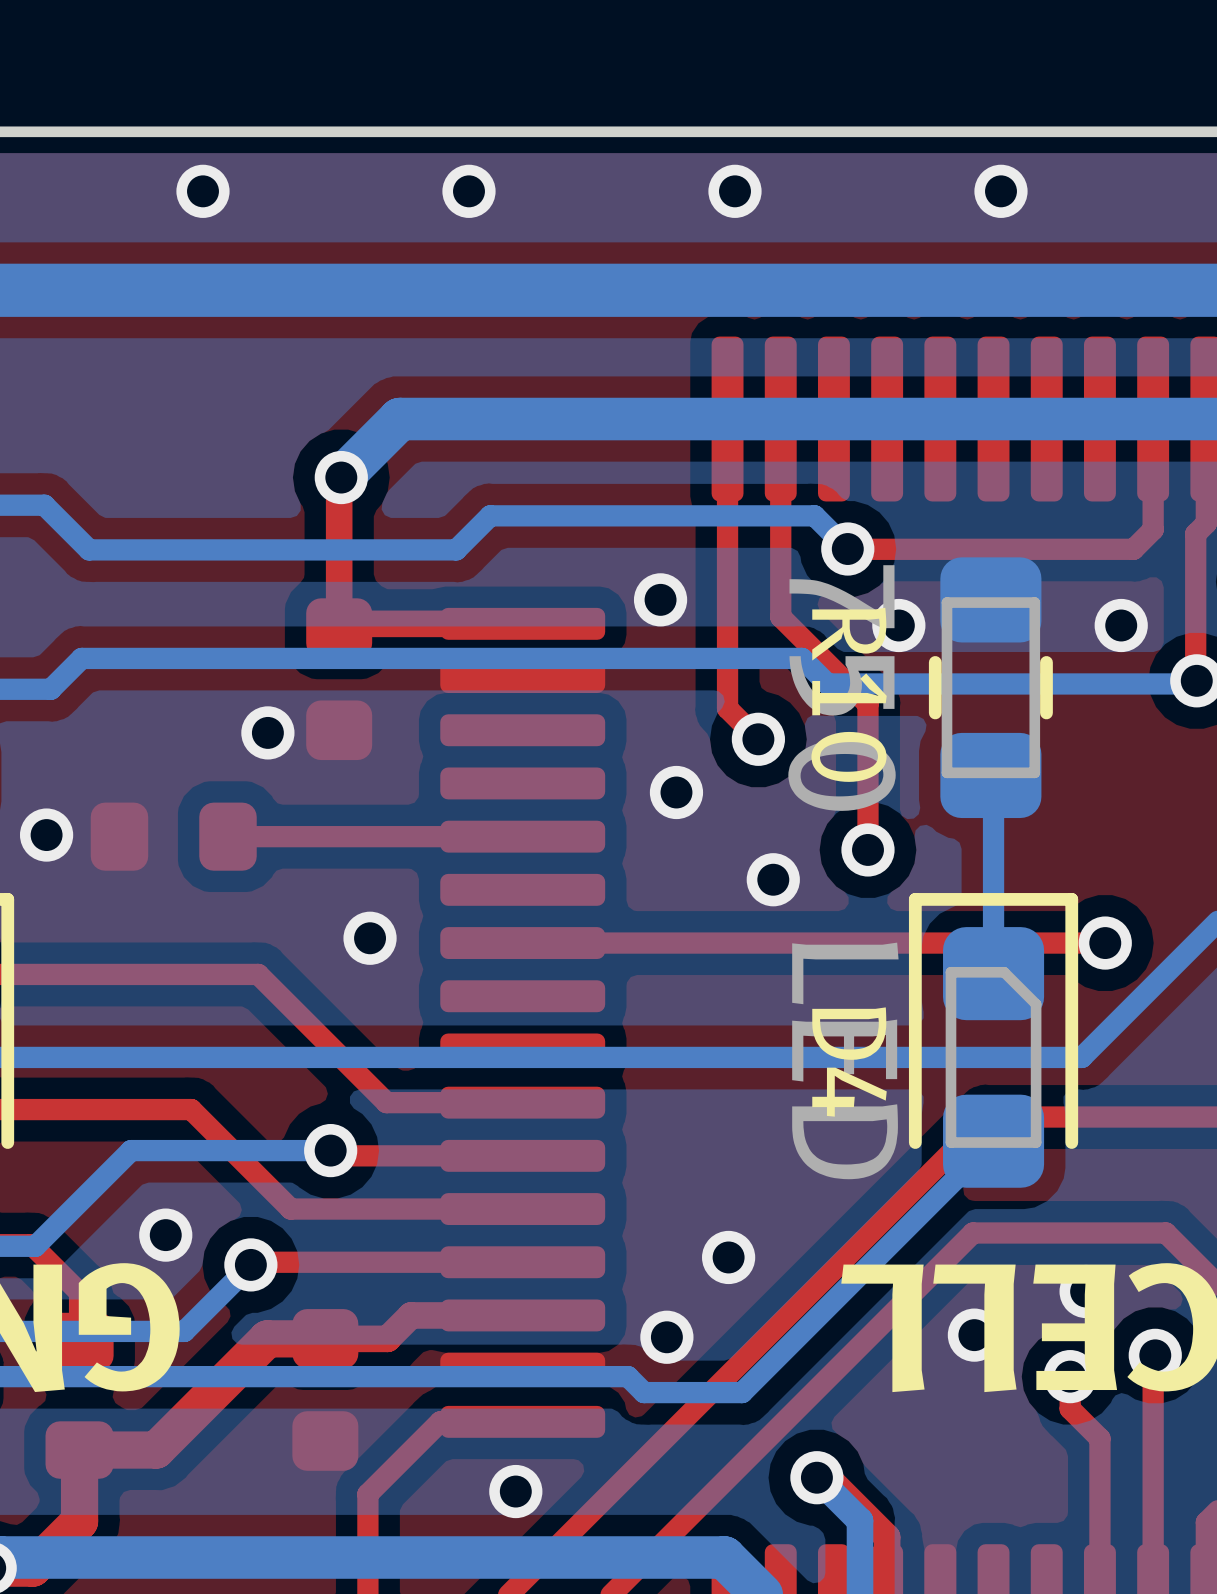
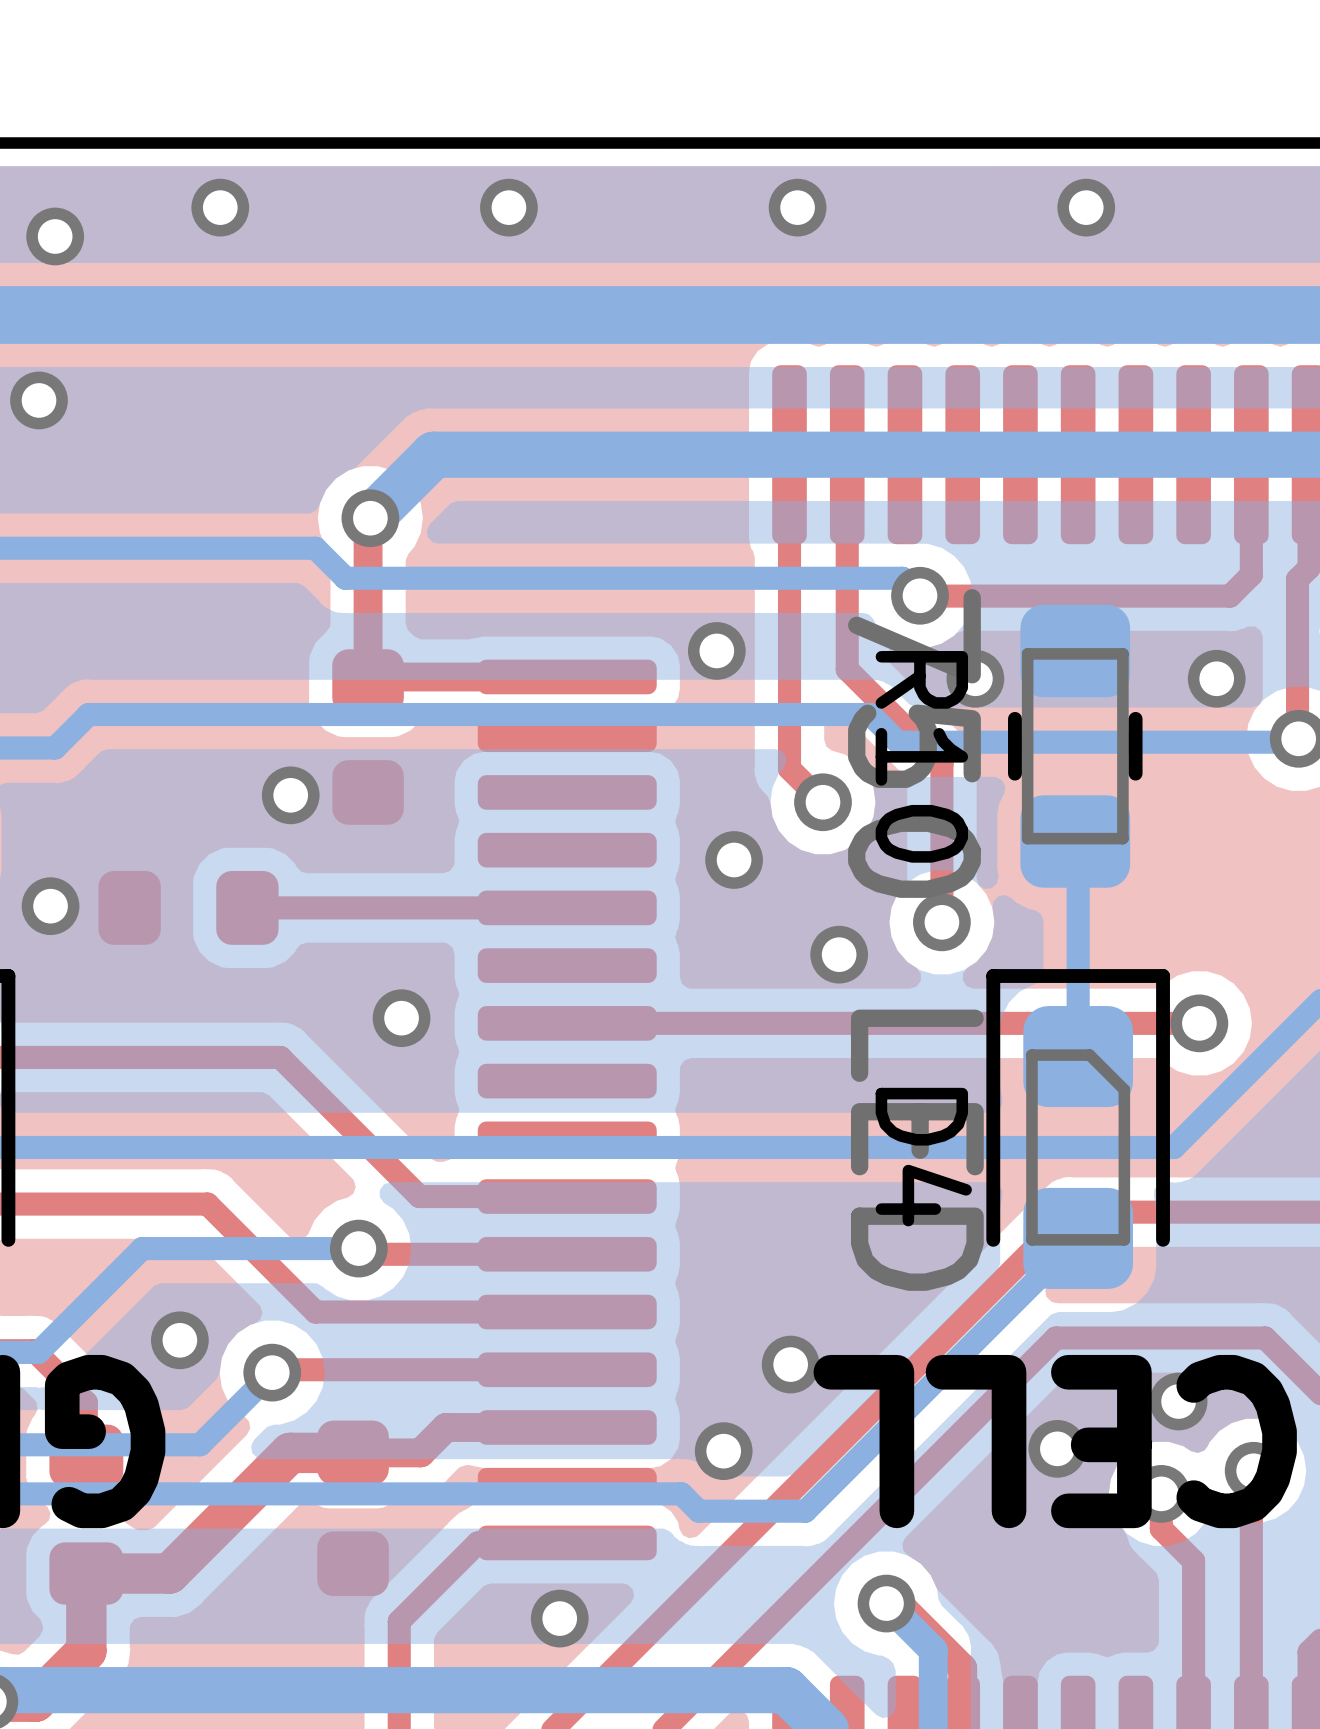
via: none -> (55, 236)
via: none -> (39, 400)
bottom track: (44, 505) (89, 549) (456, 549) (490, 515) (814, 515) (831, 532) -> (48, 548) (315, 548) (345, 578) (902, 578)

